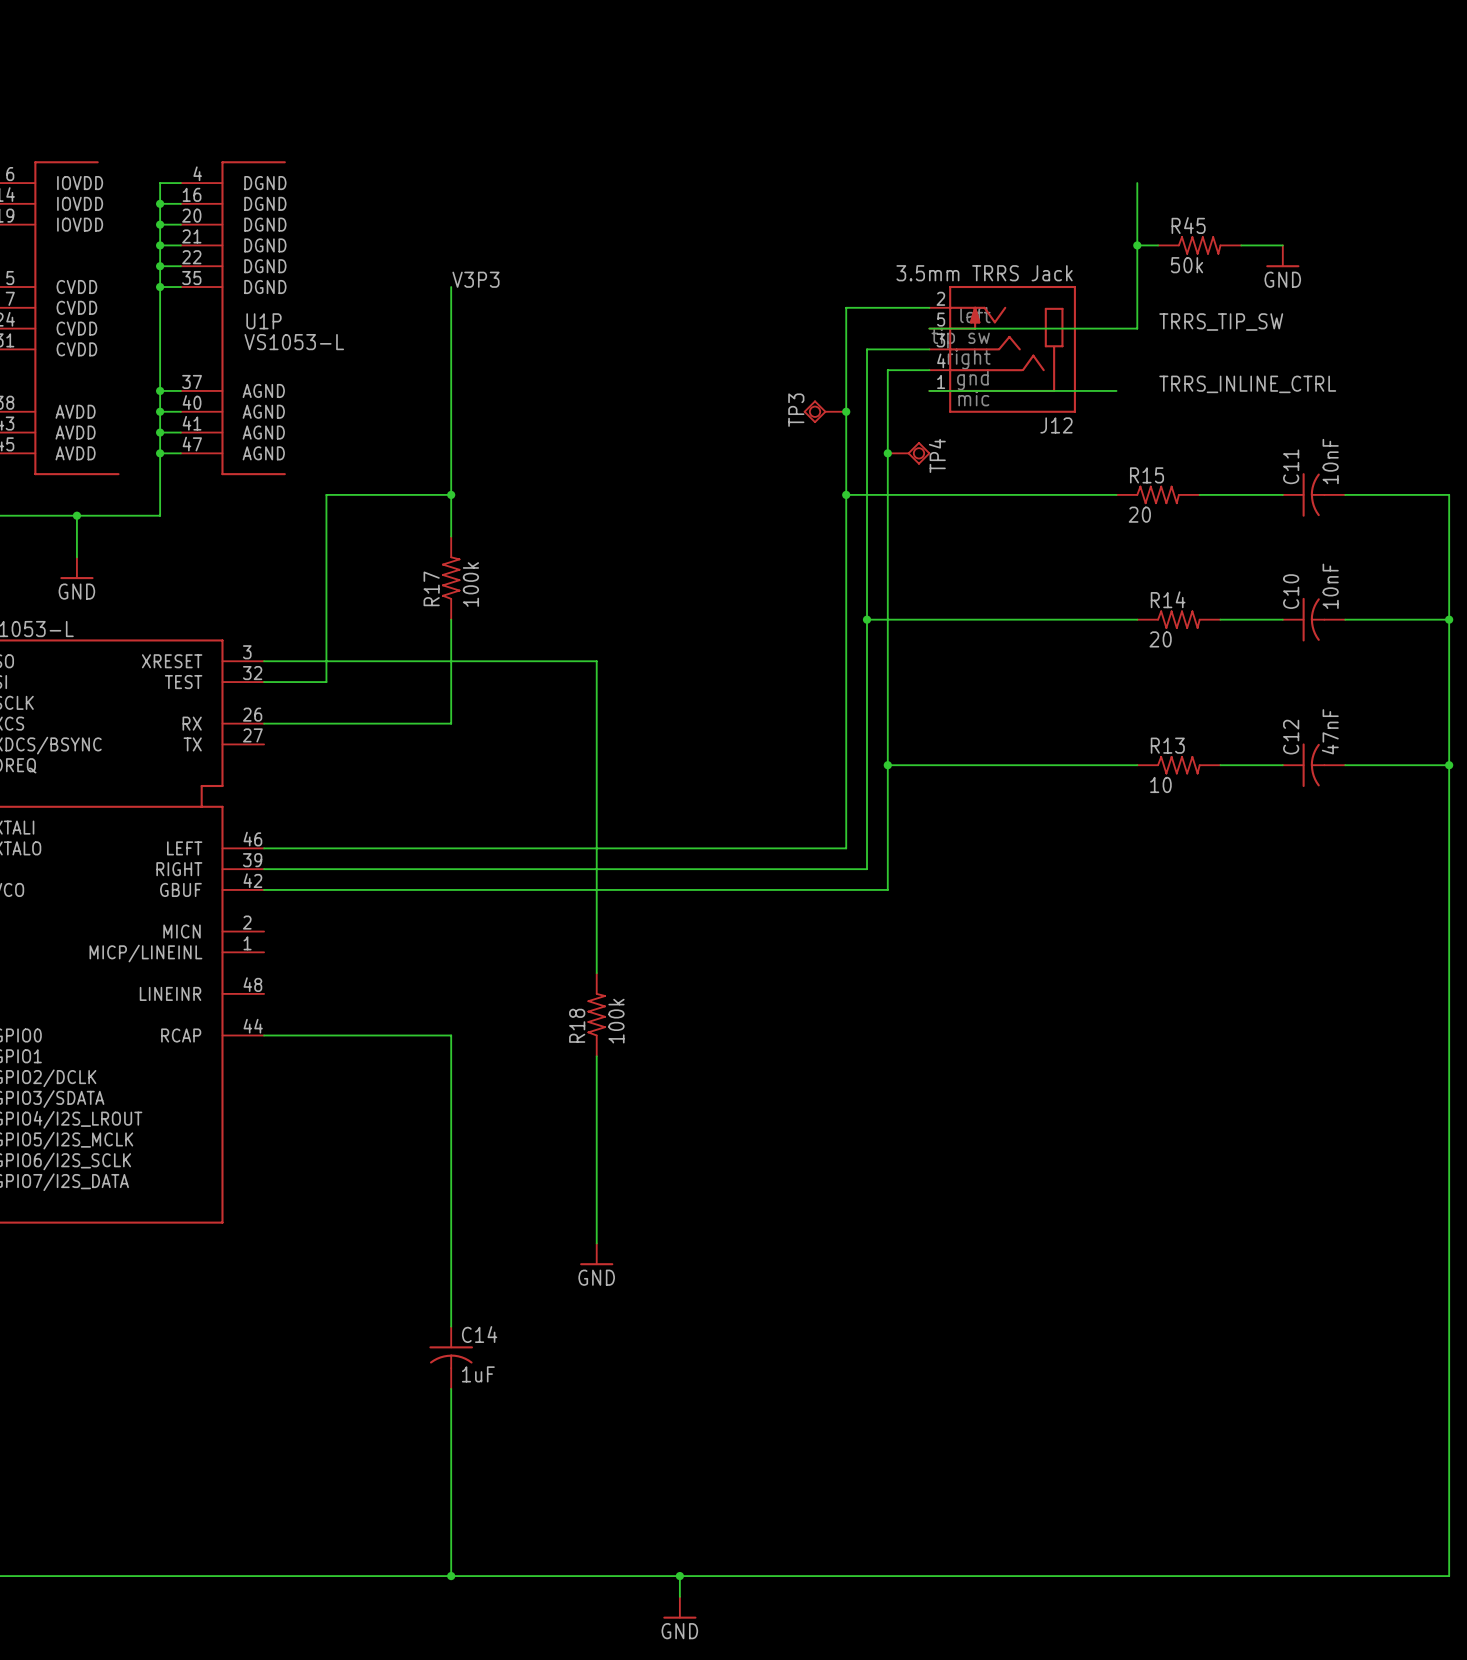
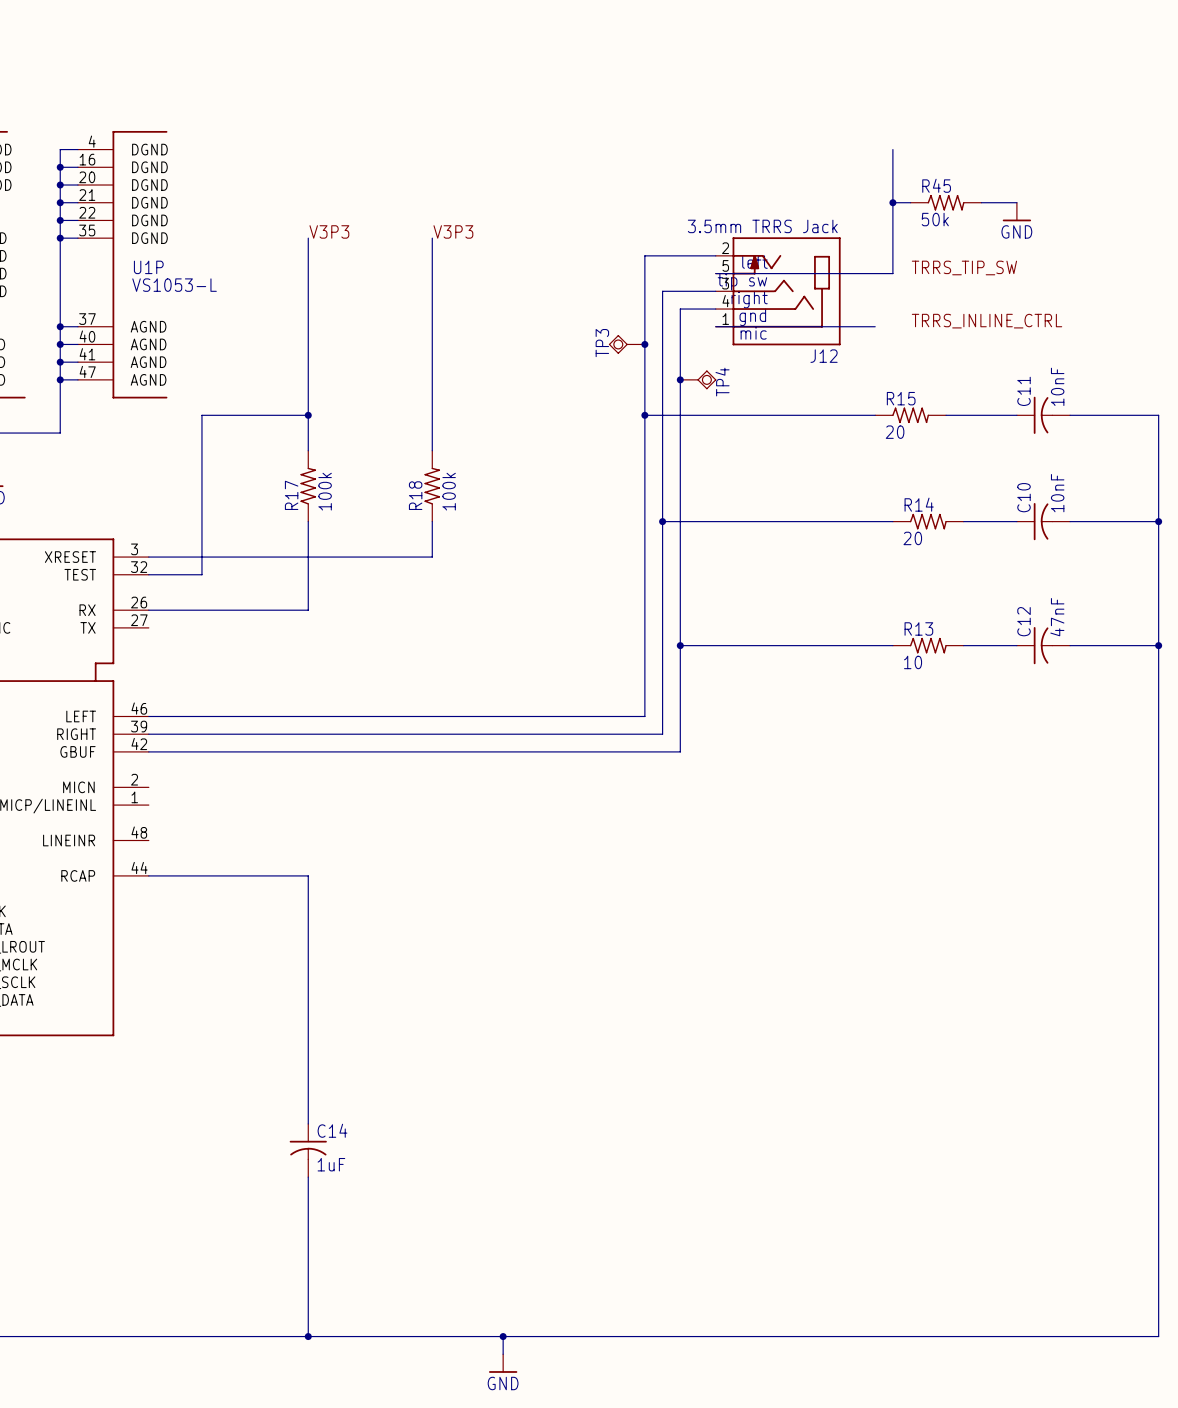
label: none -> V3P3 (453, 231)
wire: none -> (432, 238) (432, 450)
wire: (596, 661) (596, 973) -> (432, 557) (432, 521)
R18 position: (596, 1014) -> (432, 486)
wire: (596, 1056) (596, 1243) -> none
power symbol: GND (596, 1254) -> none

